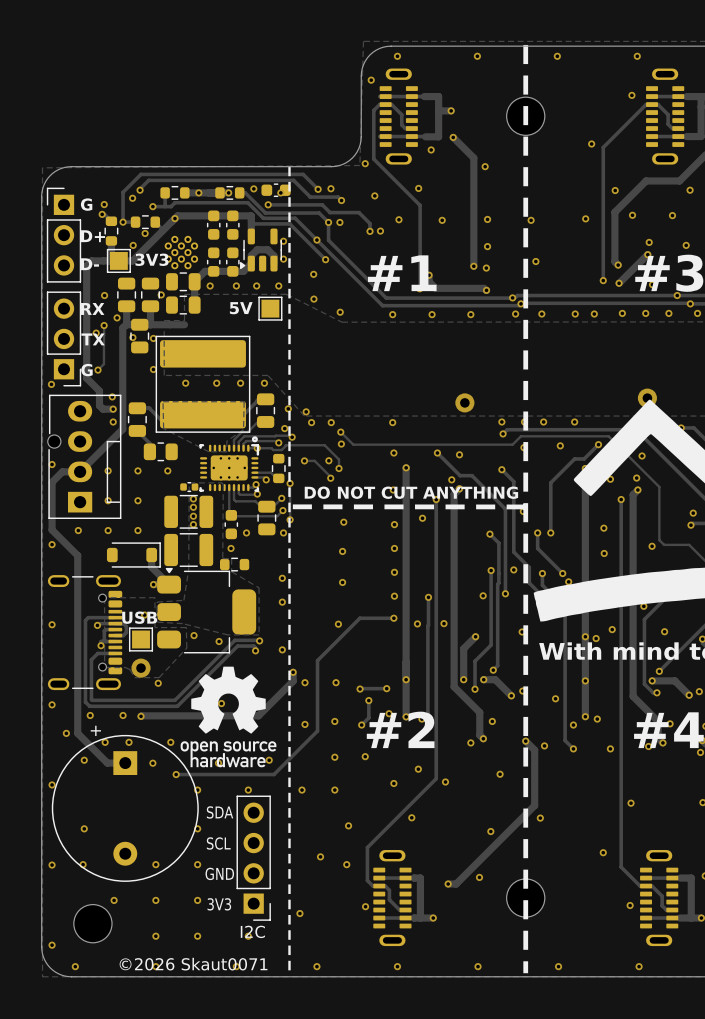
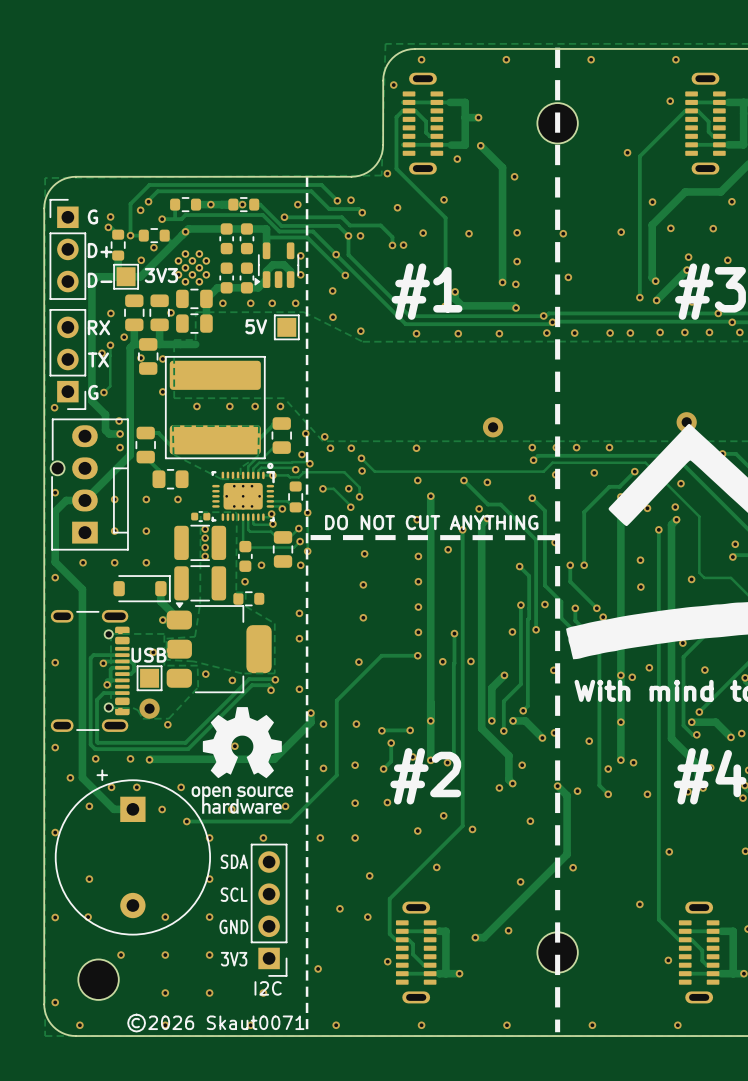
via: (253, 188) -> none
part: (276, 190) -> none

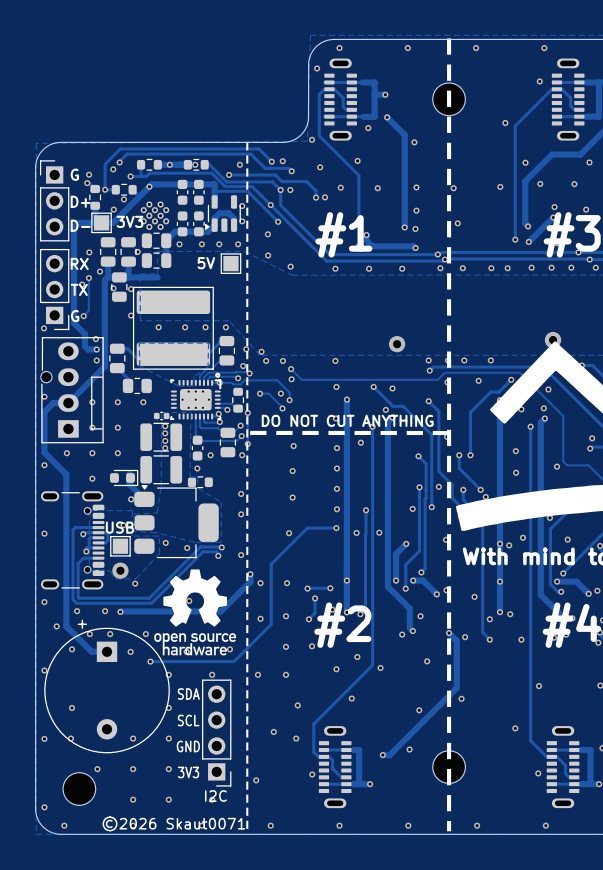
part: (142, 588) -> none
part: none -> (124, 477)
via: none -> (92, 478)

